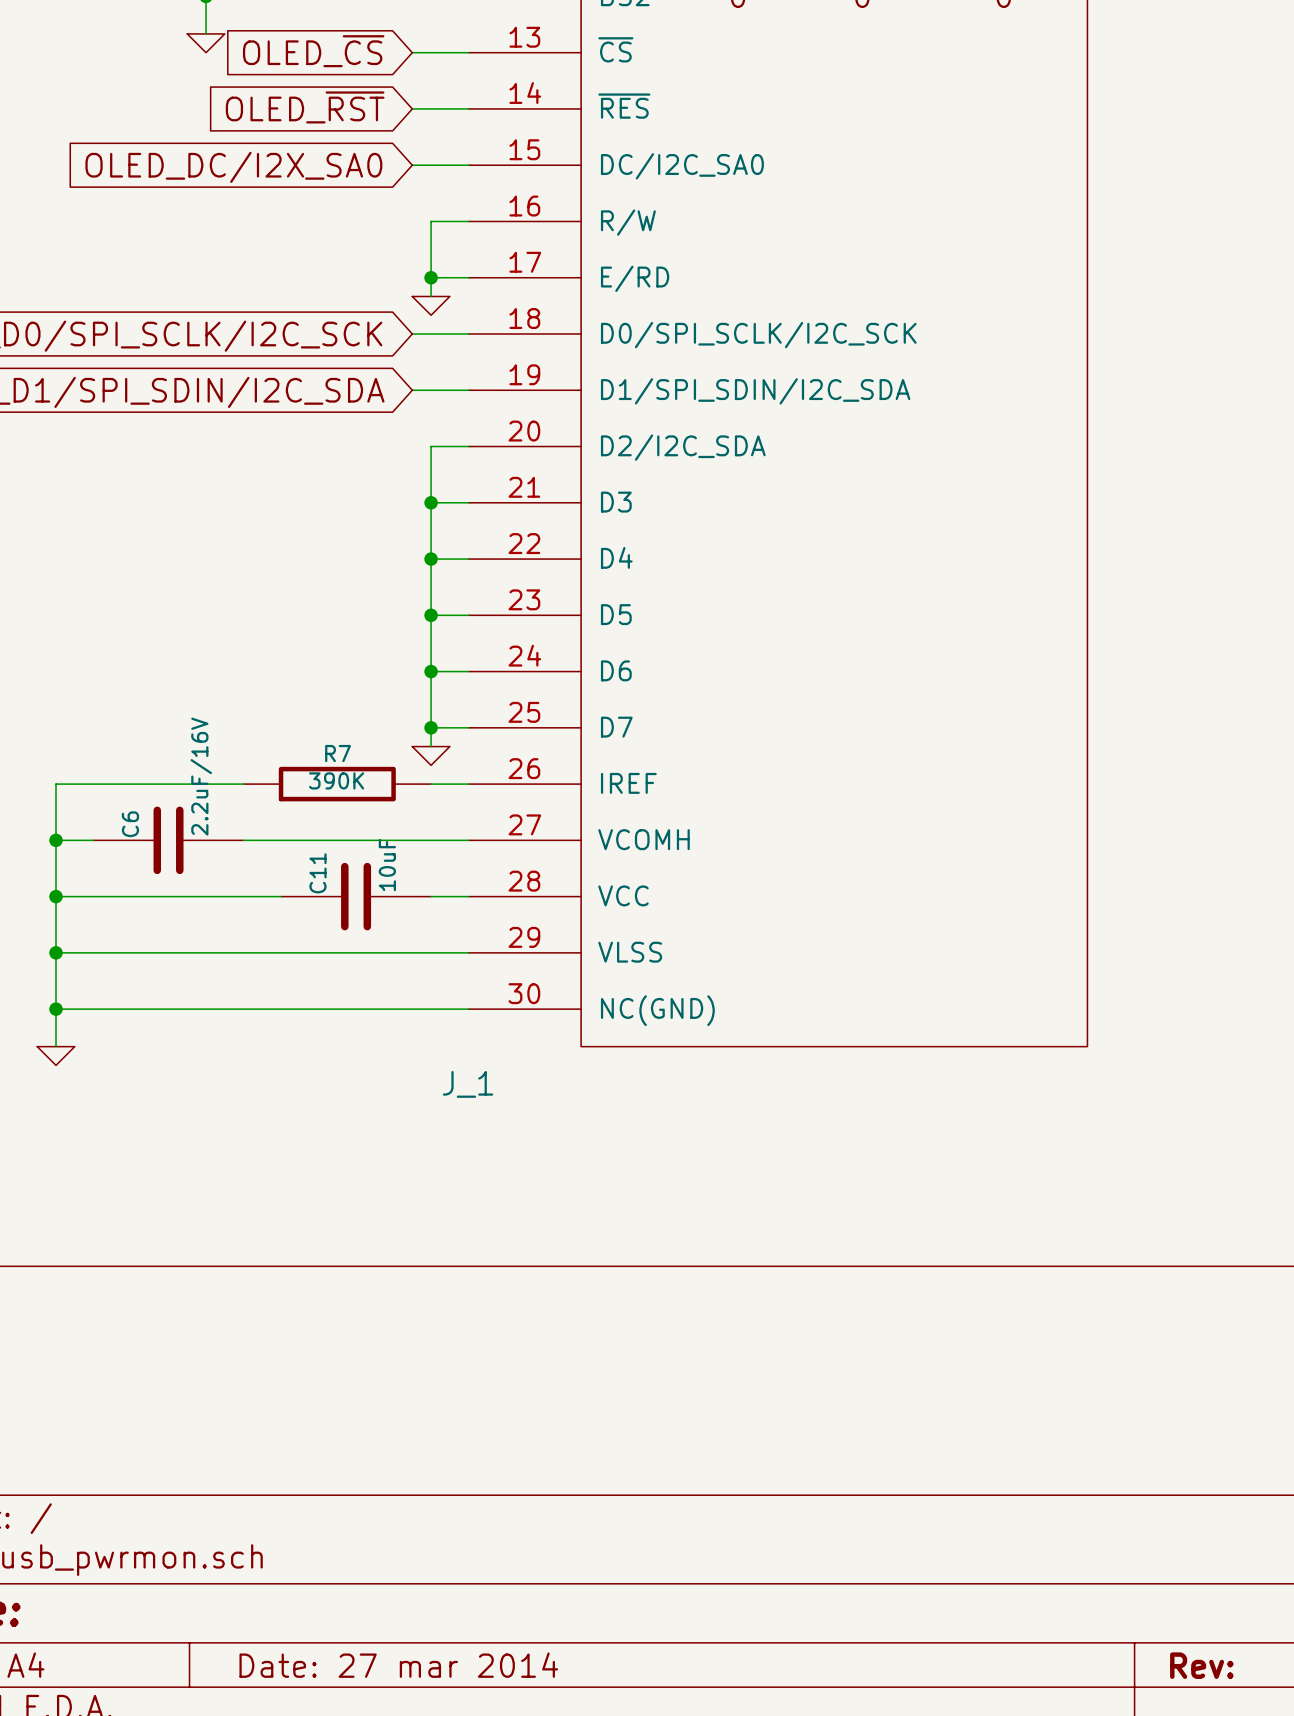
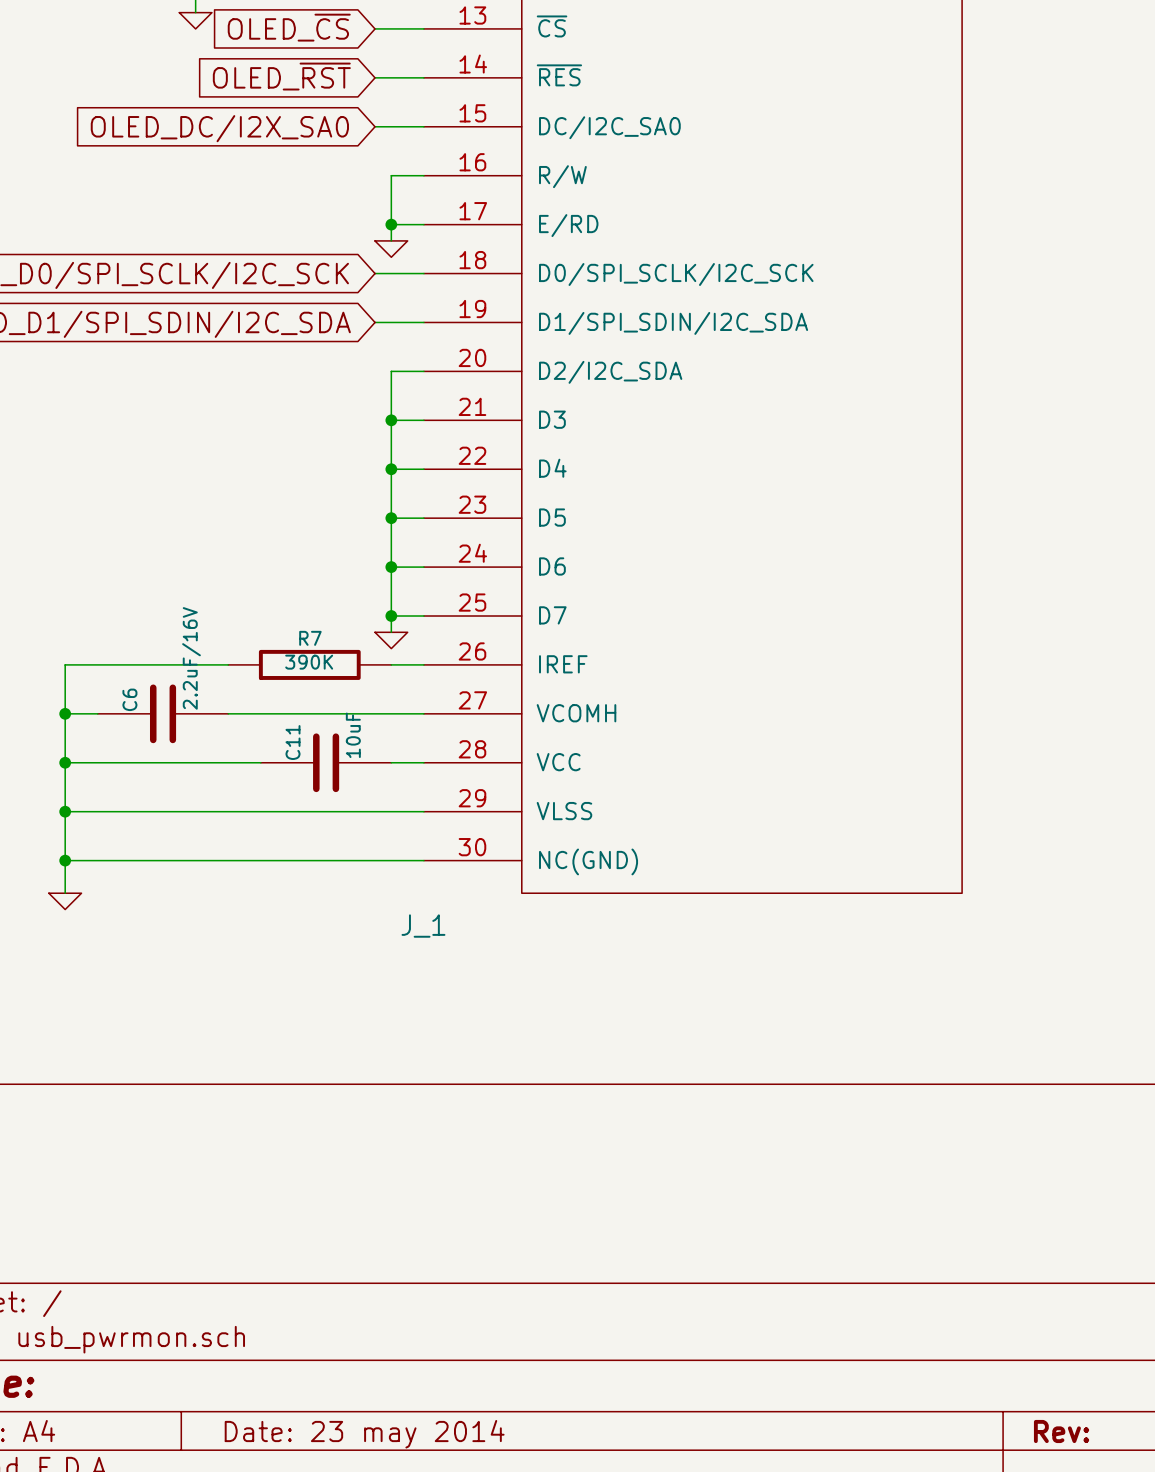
title block: Date: 27 mar 2014 (398, 1665) -> Date: 23 may 2014 (364, 1434)

